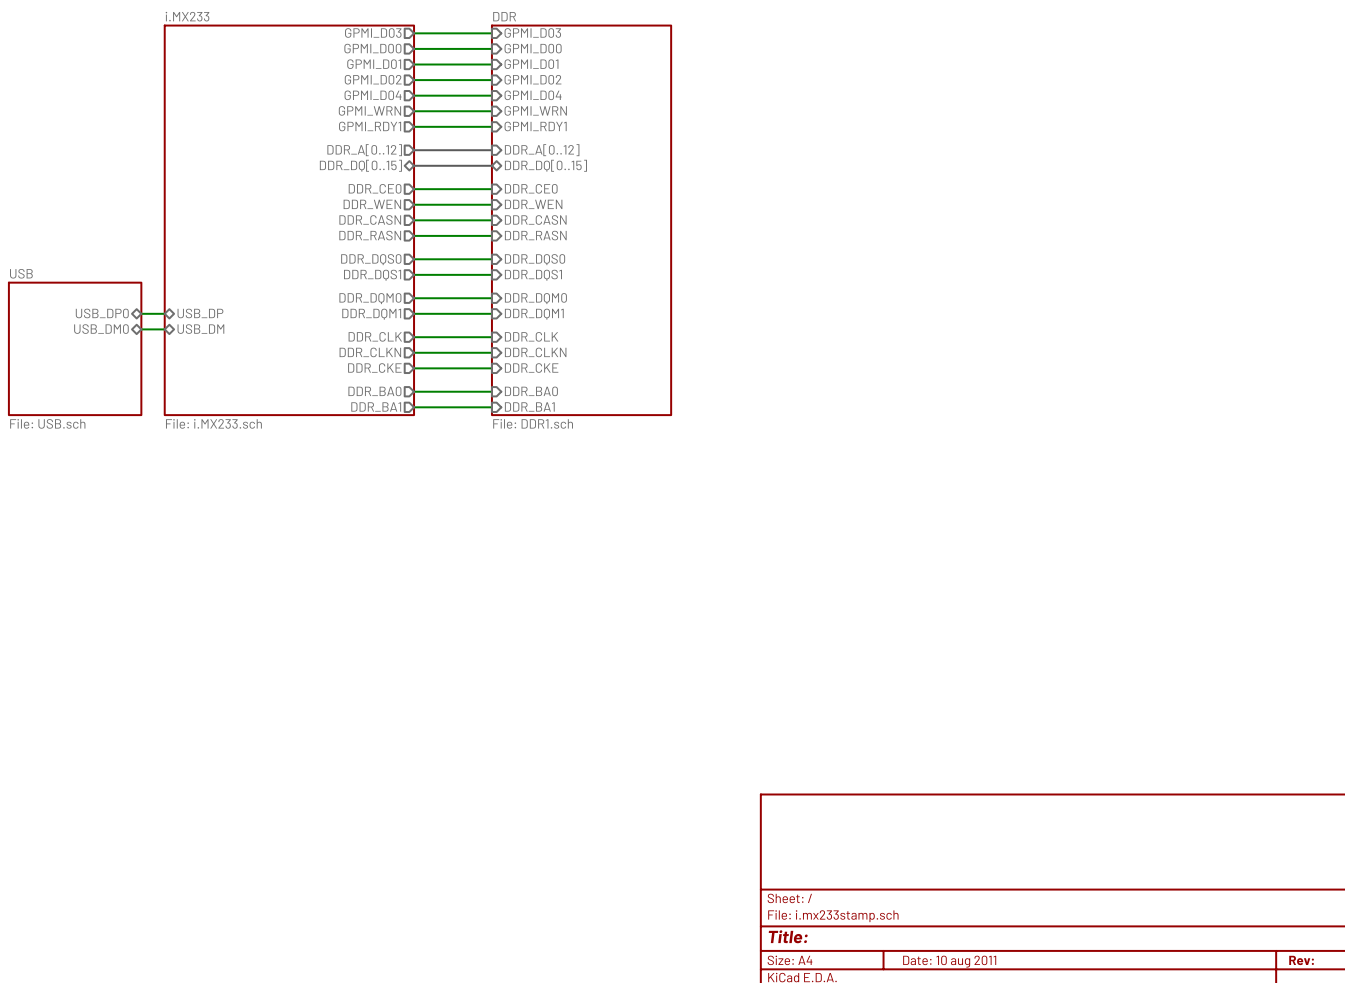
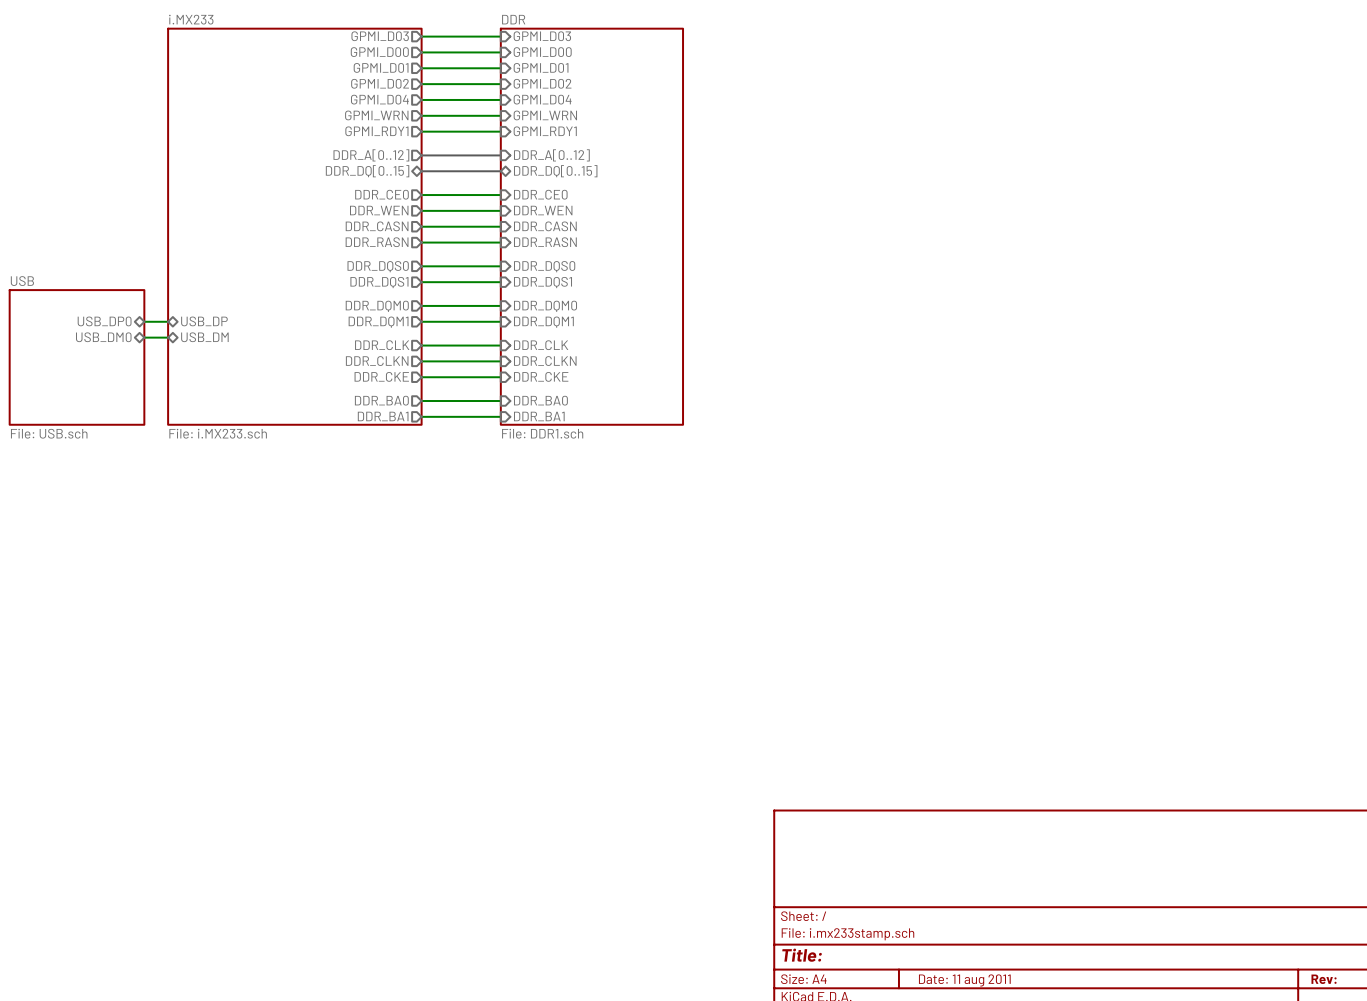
title block: Date: 10 aug 2011 (949, 961) -> Date: 11 aug 2011 (964, 980)

